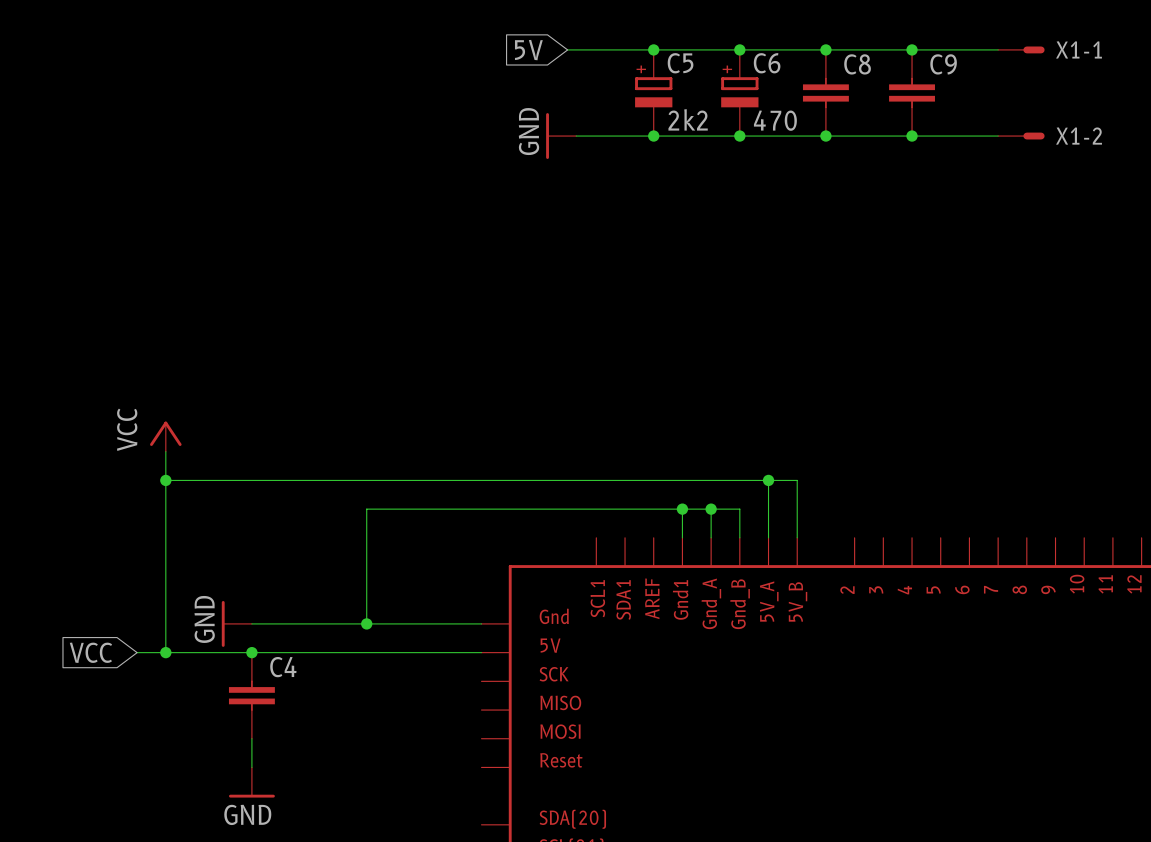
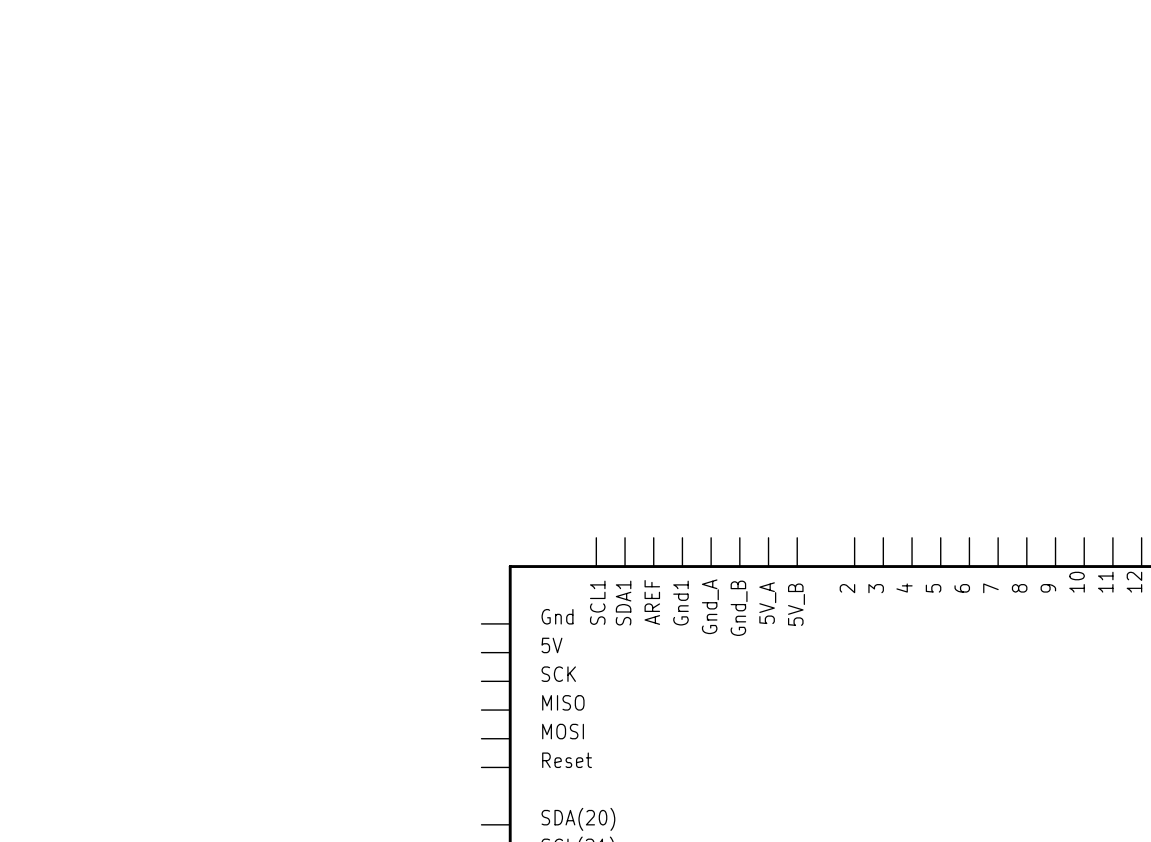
wire: (567, 49) (998, 49) -> none
junction: (653, 49) -> none
junction: (739, 49) -> none
junction: (825, 49) -> none
junction: (912, 49) -> none
X1-1: (1021, 49) -> none
global label: 5V (528, 50) -> none
C5: 2k2 (653, 92) -> none
C6: 470 (739, 92) -> none
C8: (825, 92) -> none
C9: (912, 92) -> none
power symbol: GND (561, 136) -> none
wire: (576, 136) (998, 136) -> none
junction: (653, 136) -> none
junction: (739, 136) -> none
junction: (825, 136) -> none
junction: (912, 136) -> none
X1-2: (1021, 136) -> none
power symbol: VCC (165, 436) -> none
wire: (165, 451) (165, 652) -> none
wire: (165, 480) (797, 480) (797, 537) -> none
junction: (165, 480) -> none
wire: (768, 480) (768, 537) -> none
junction: (768, 480) -> none
wire: (682, 509) (682, 537) -> none
junction: (682, 509) -> none
wire: (711, 509) (711, 537) -> none
junction: (711, 509) -> none
wire: (739, 537) (739, 509) (366, 509) (366, 623) -> none
power symbol: GND (236, 623) -> none
wire: (251, 623) (481, 623) -> none
junction: (366, 623) -> none
global label: VCC (90, 652) -> none
wire: (137, 652) (481, 652) -> none
junction: (165, 652) -> none
junction: (251, 652) -> none
C4: (251, 695) -> none
wire: (251, 738) (251, 767) -> none
power symbol: GND (251, 782) -> none

